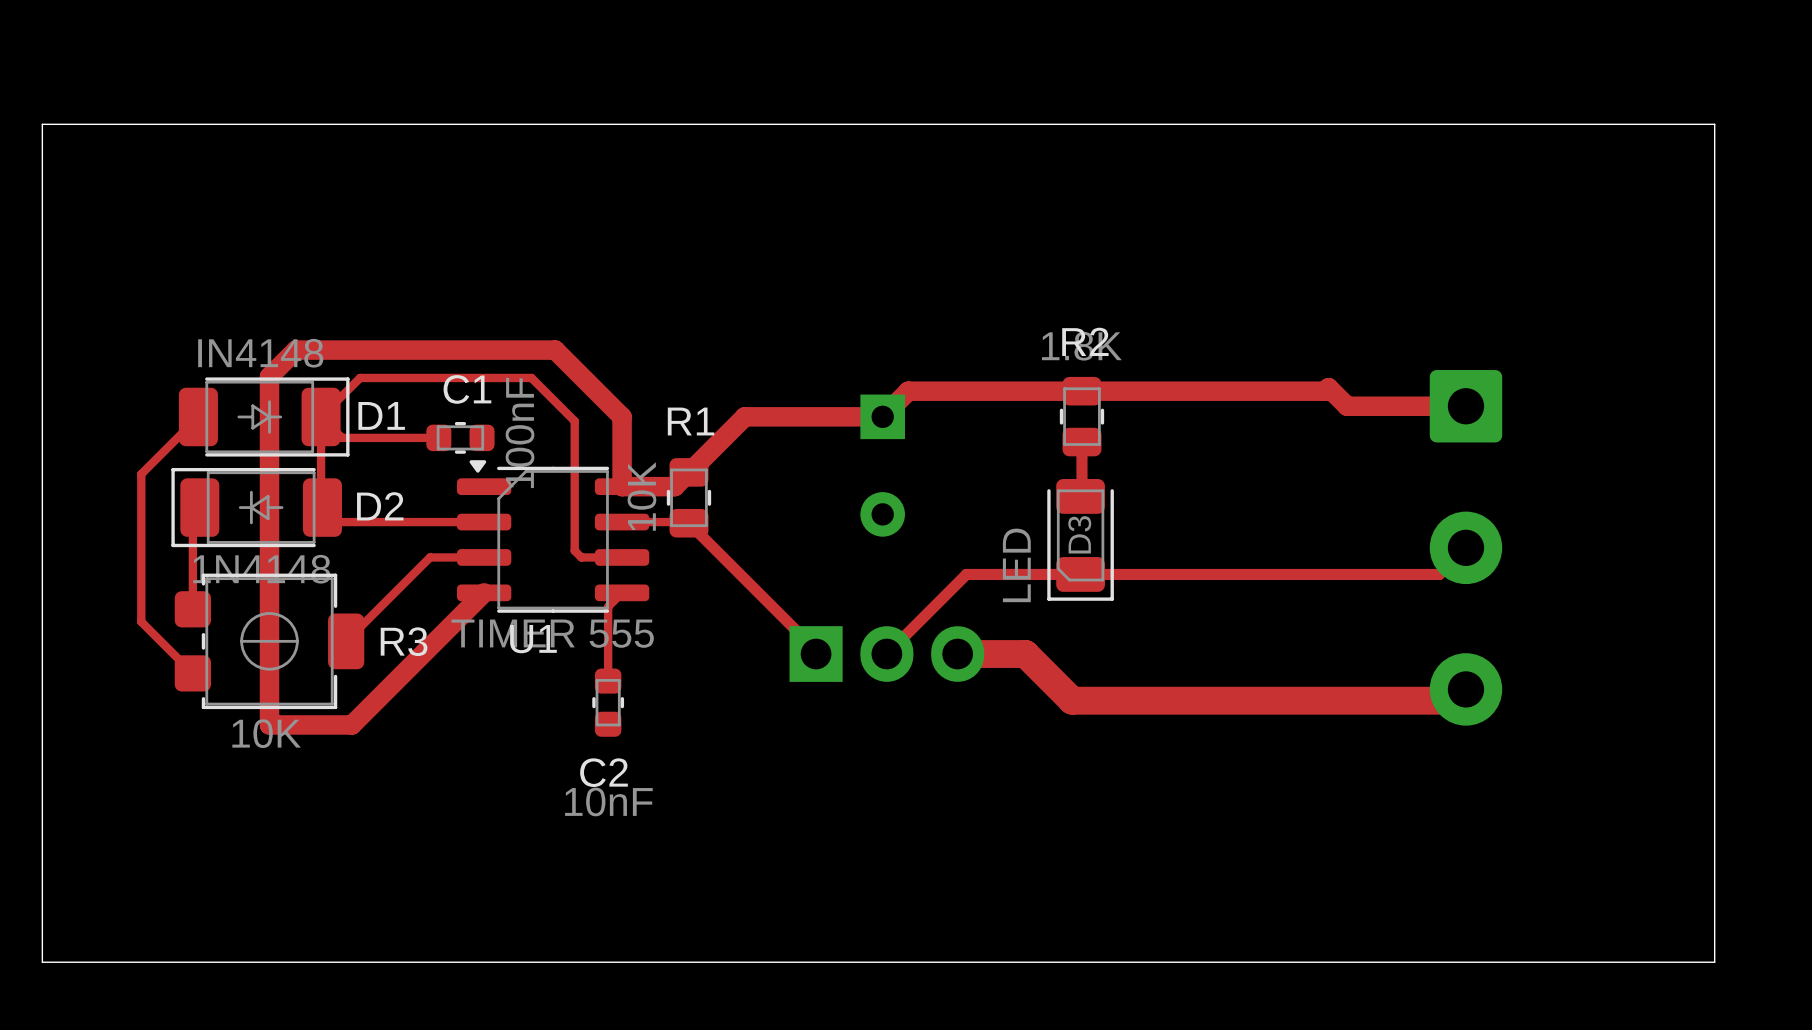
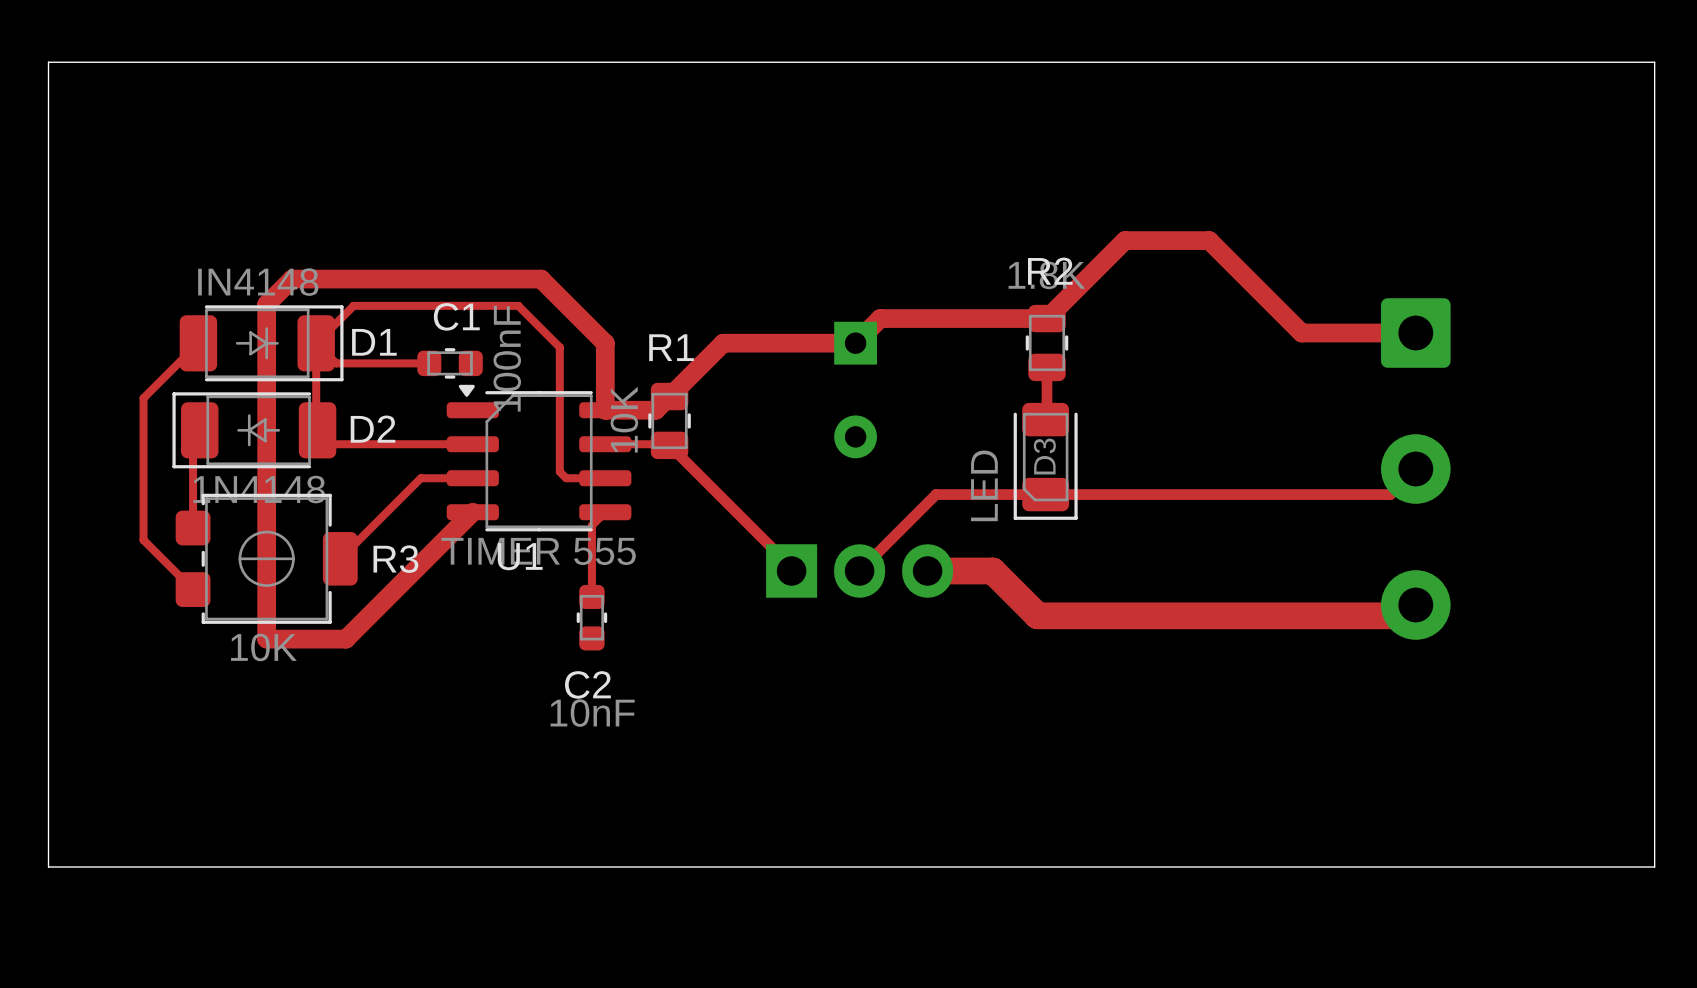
top track: (1328, 387) (1325, 391) (1081, 391) -> (1283, 315) (1209, 240) (1124, 240) (1047, 318)

